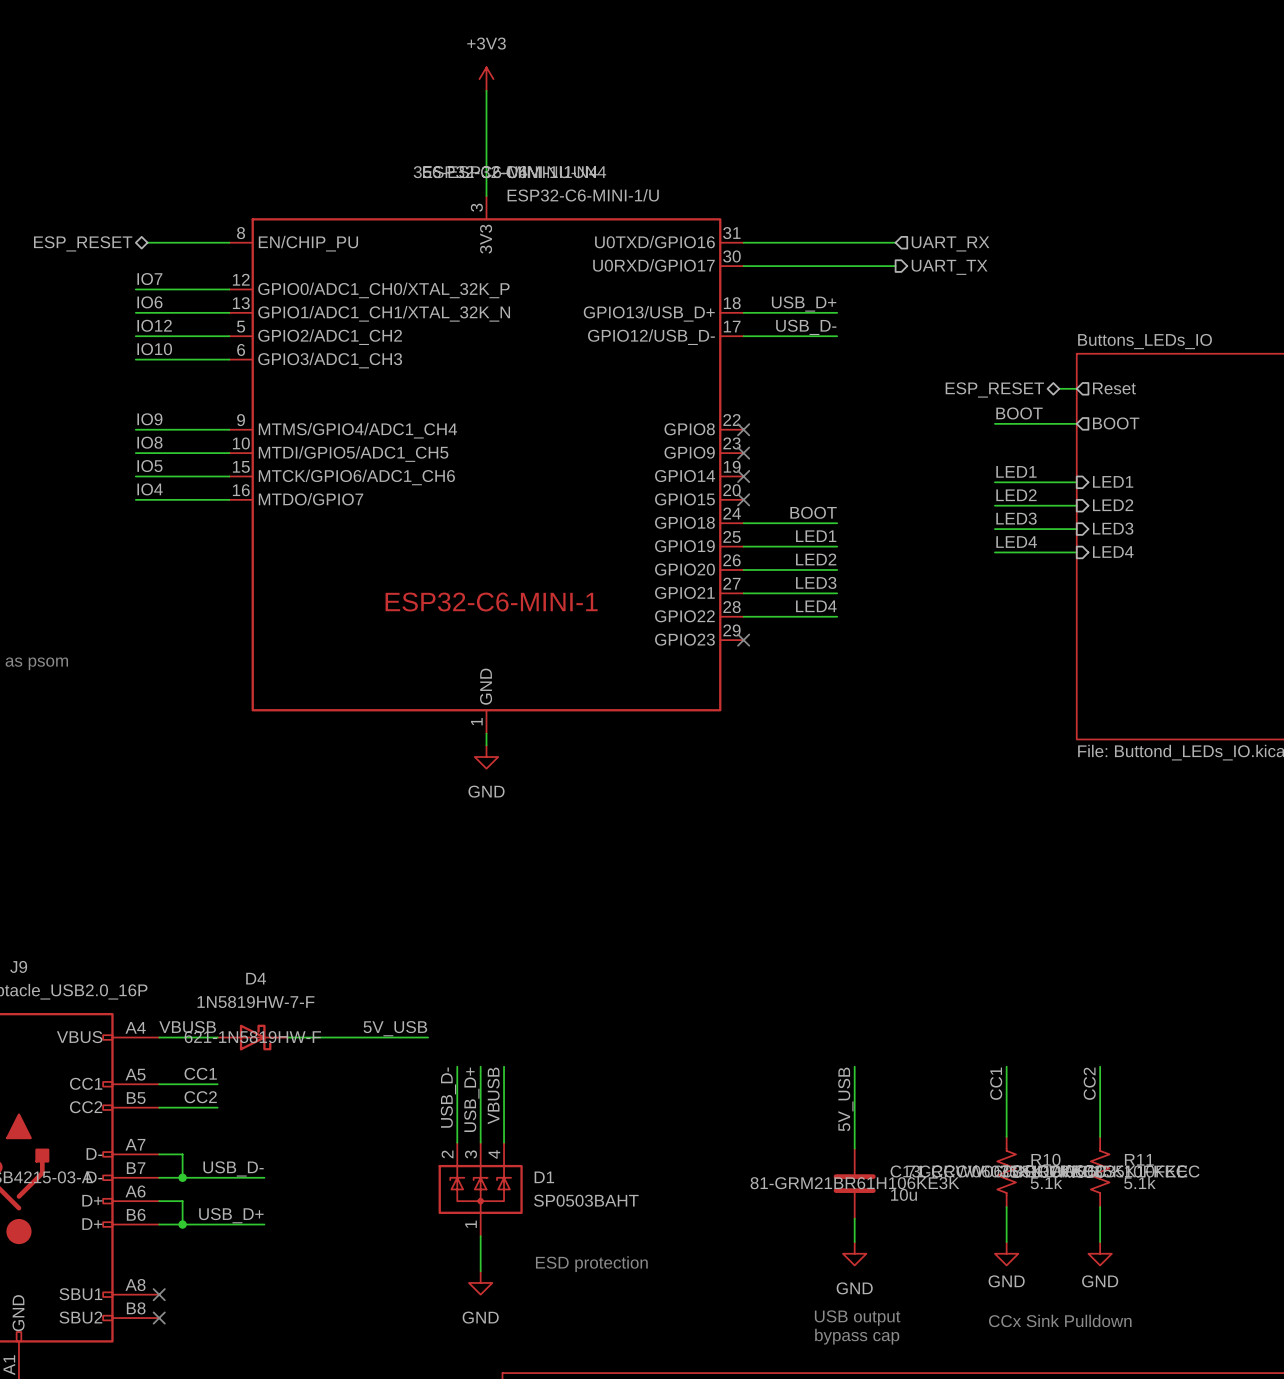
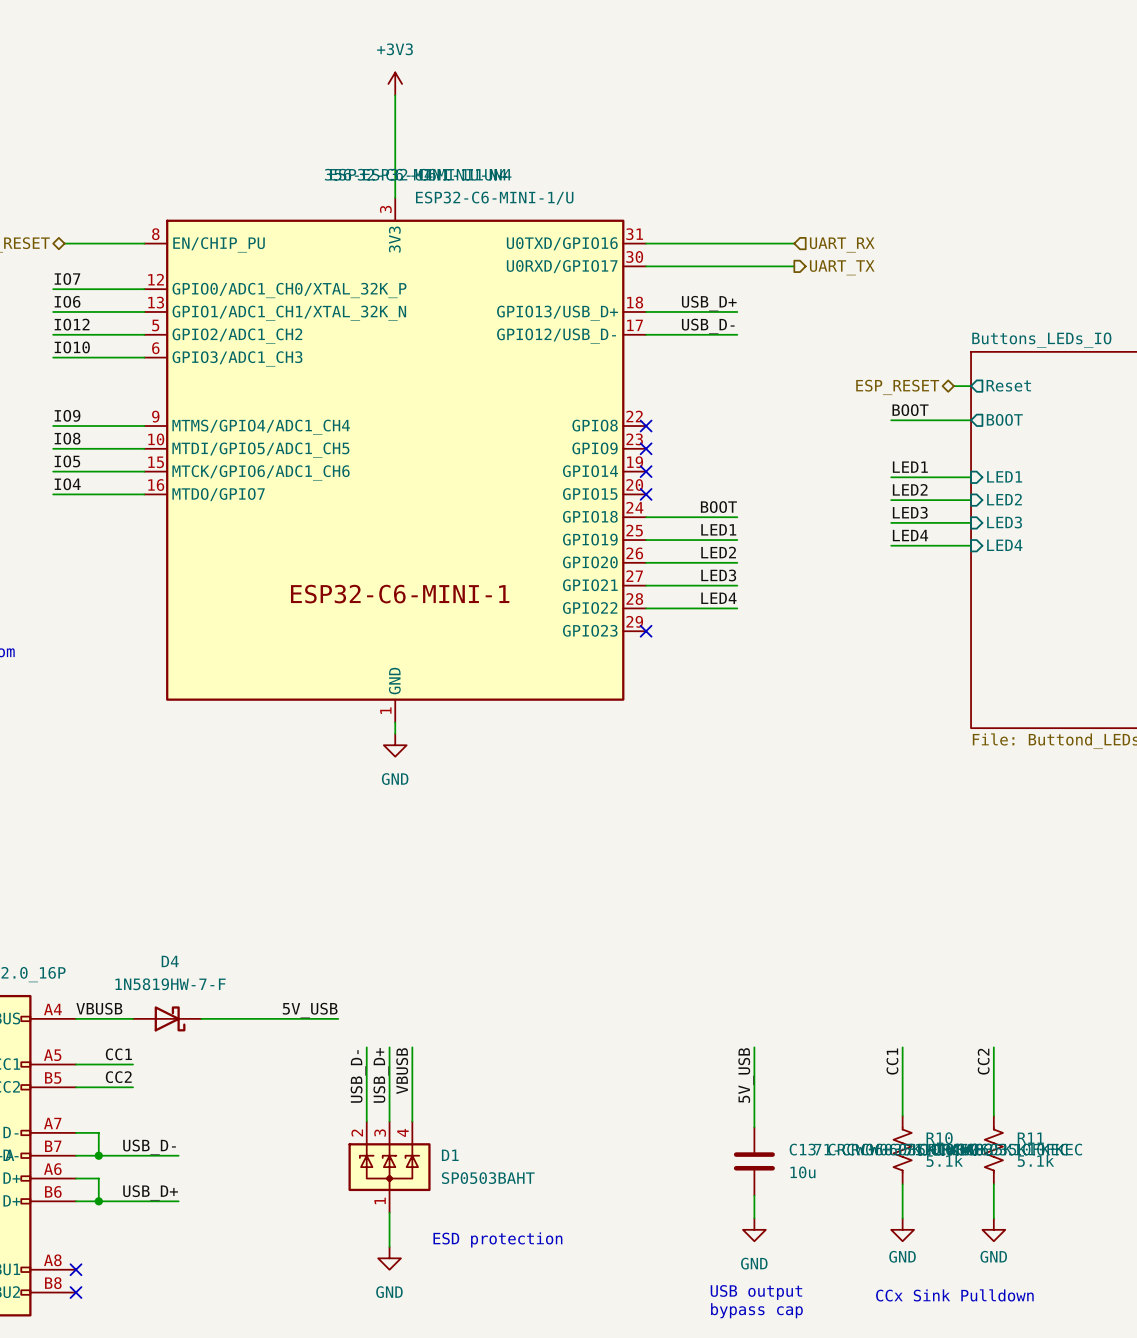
D4 text: 621-1N5819HW-F (252, 1037) -> none
C13 text: 81-GRM21BR61H106KE3K (854, 1183) -> none

